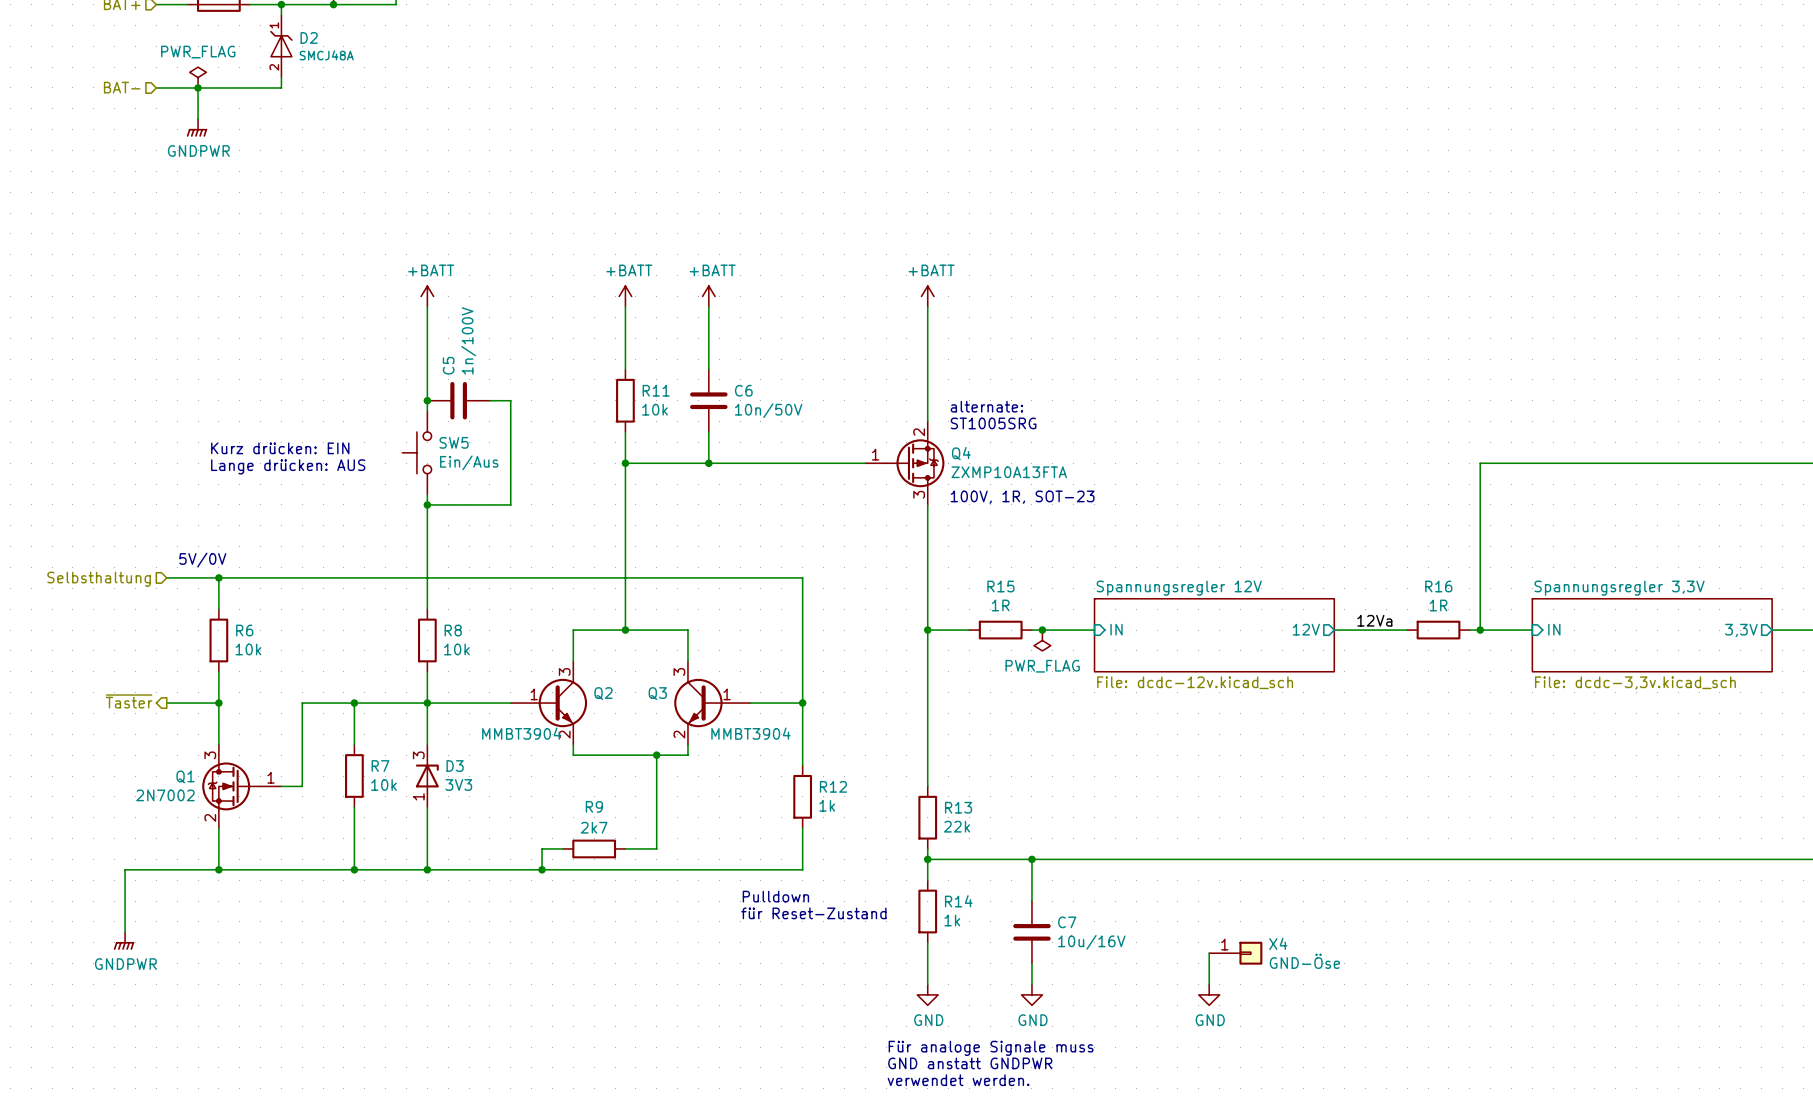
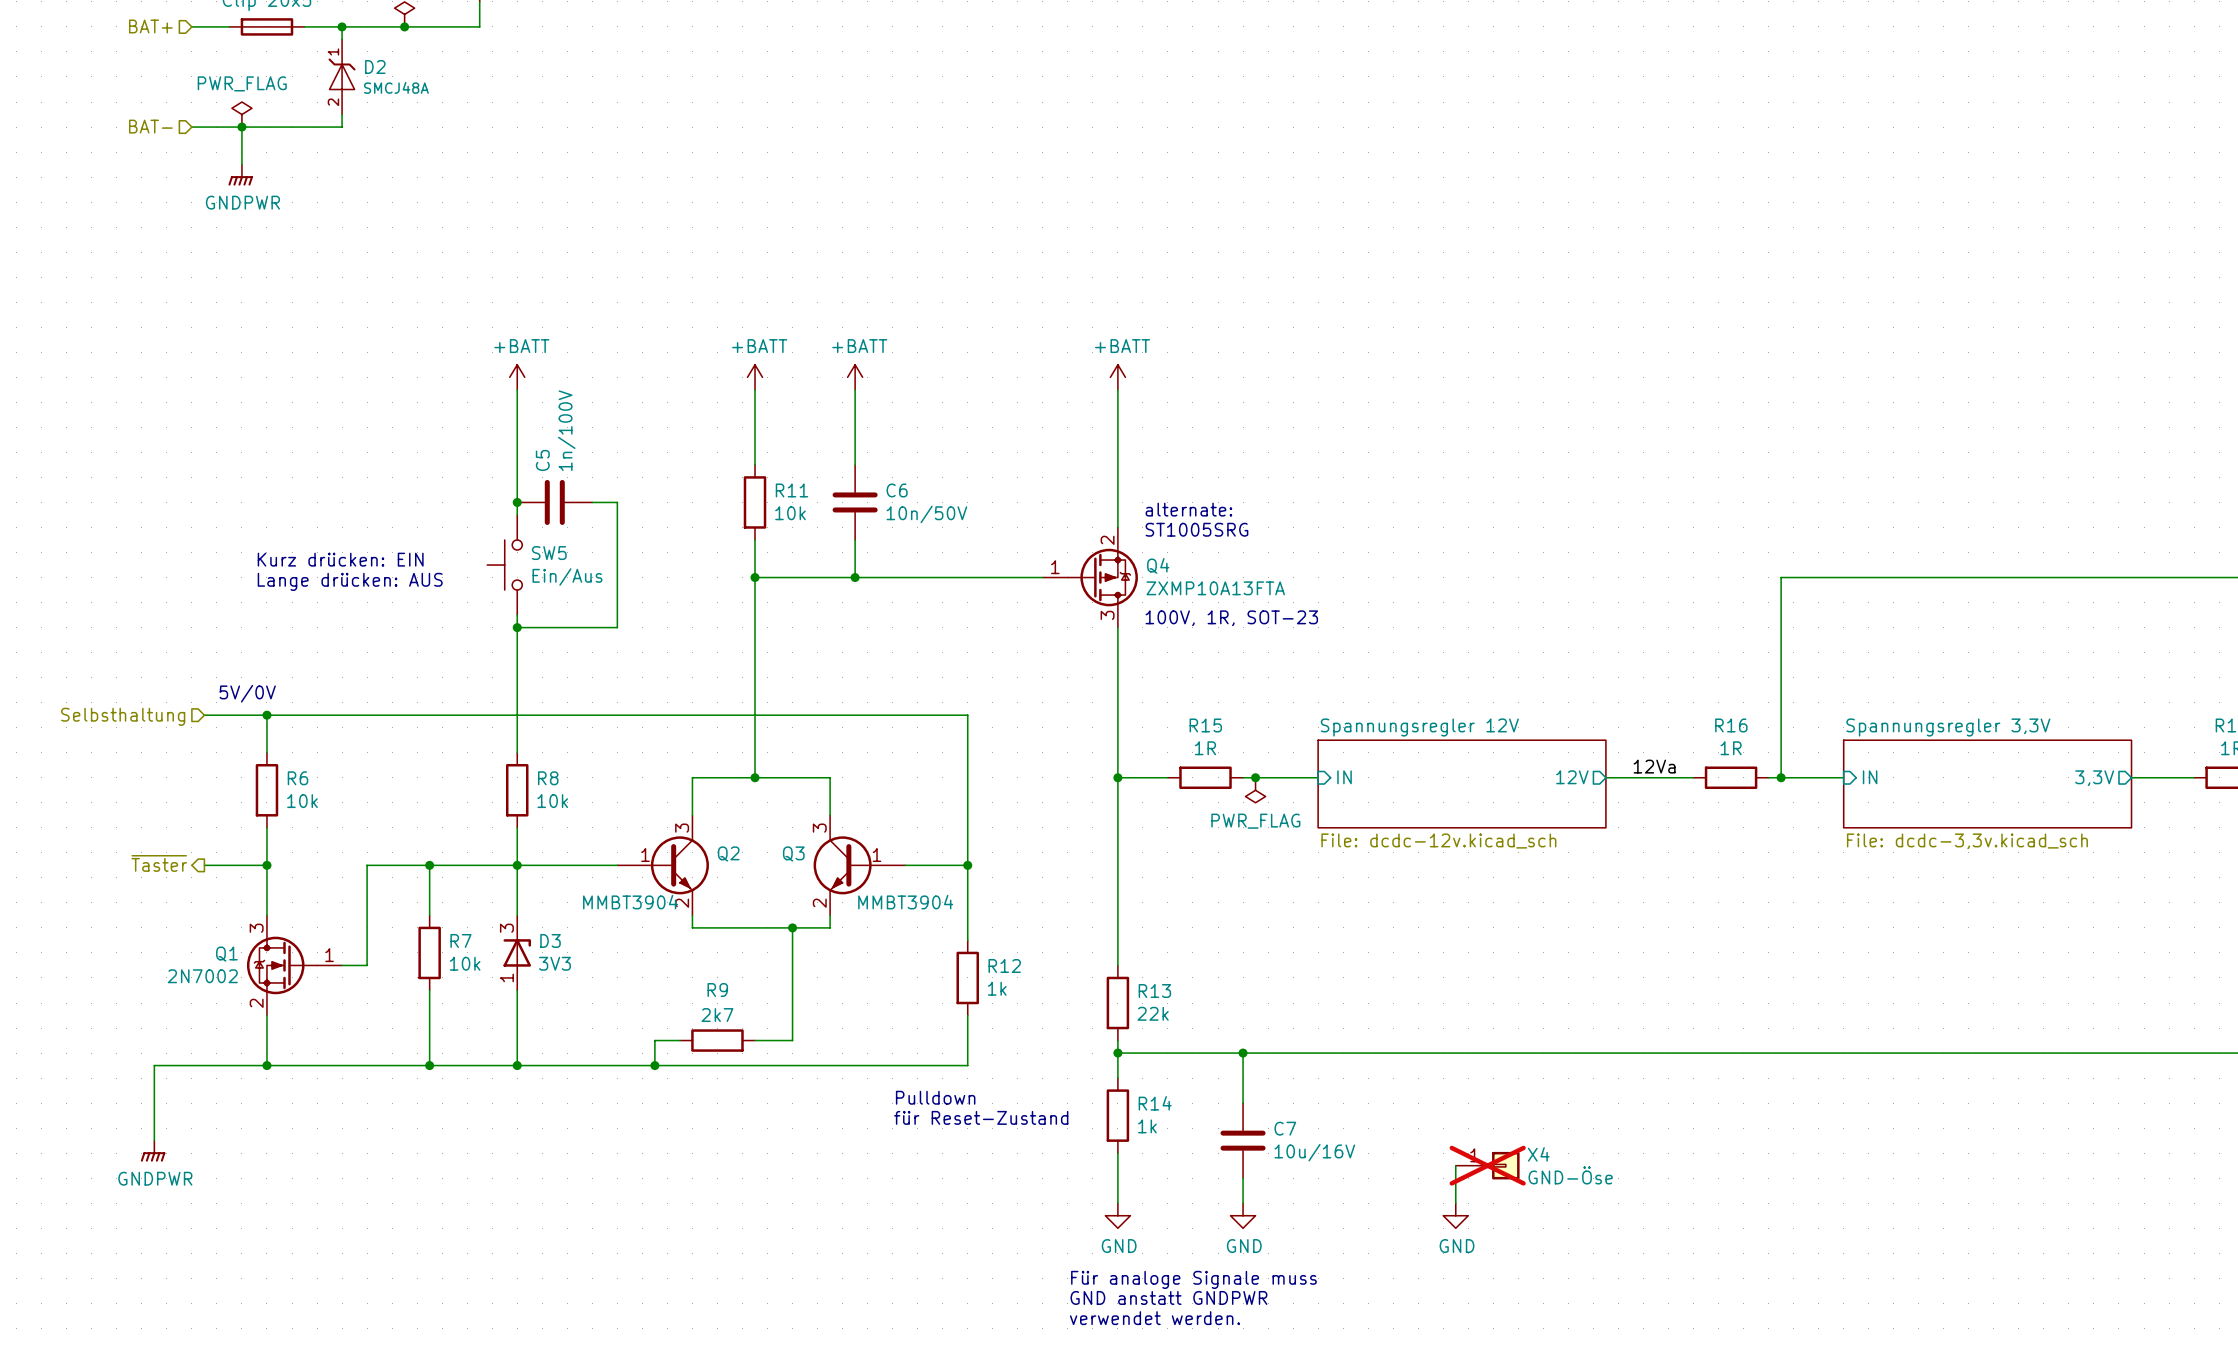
X4 do-not-place cross: none -> (1487, 1165)

